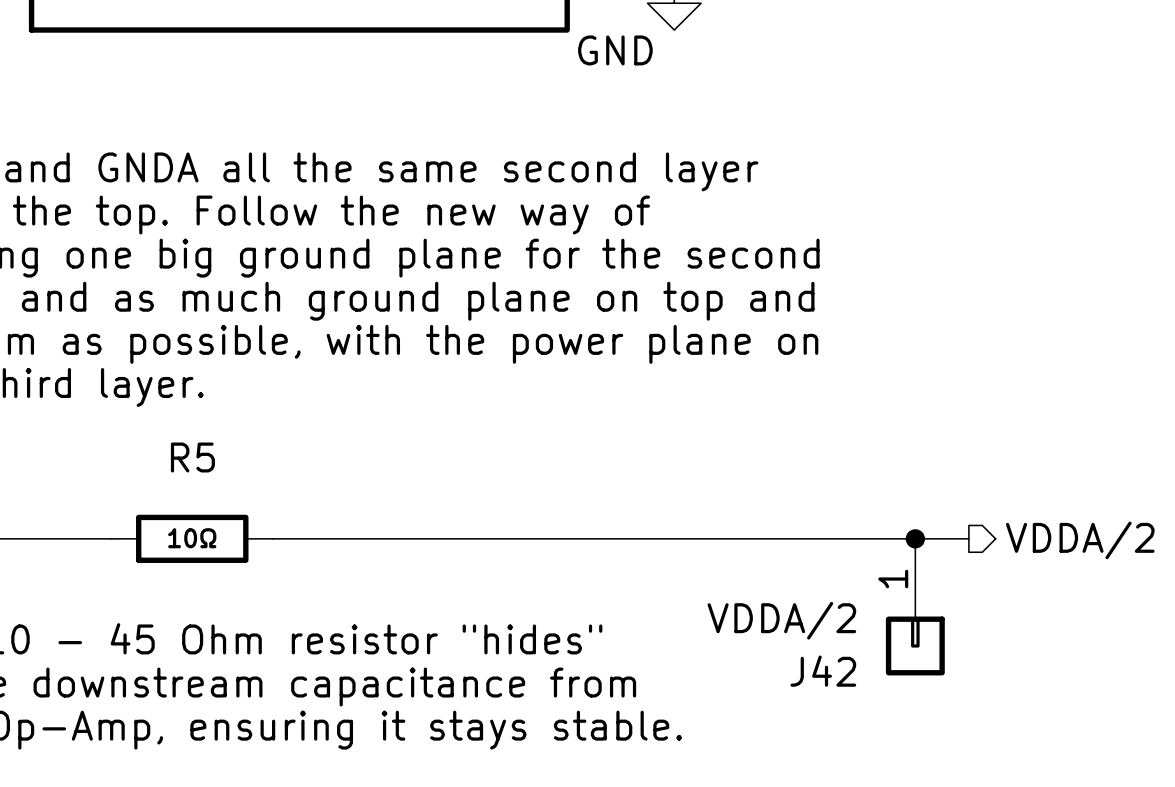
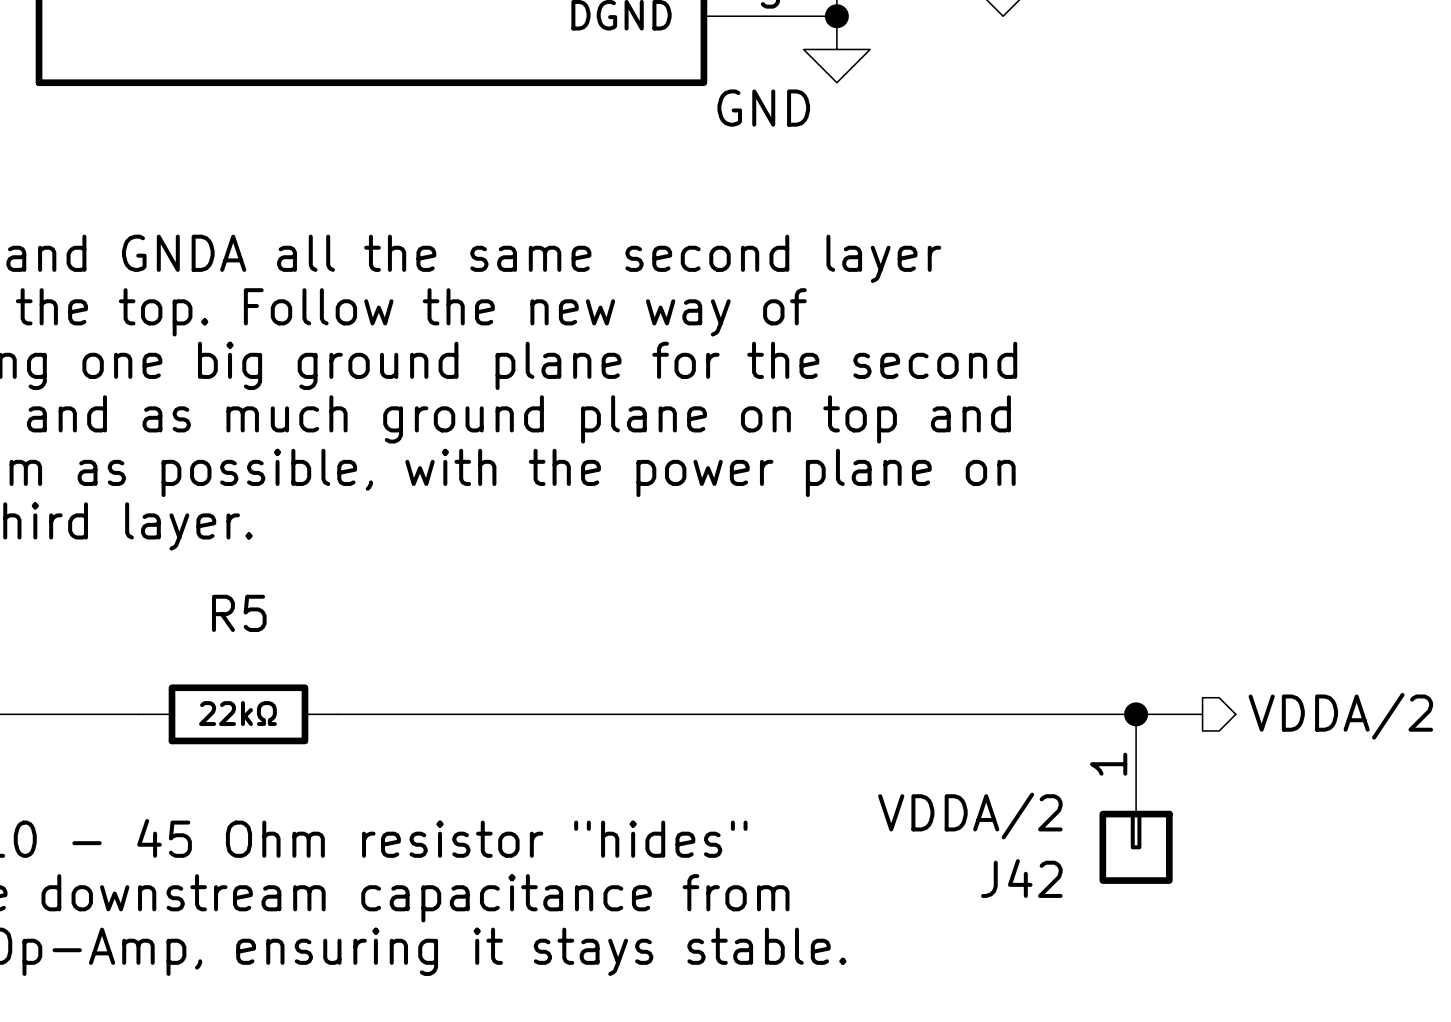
R5 value: 10Ω (192, 538) -> 22kΩ (238, 713)

